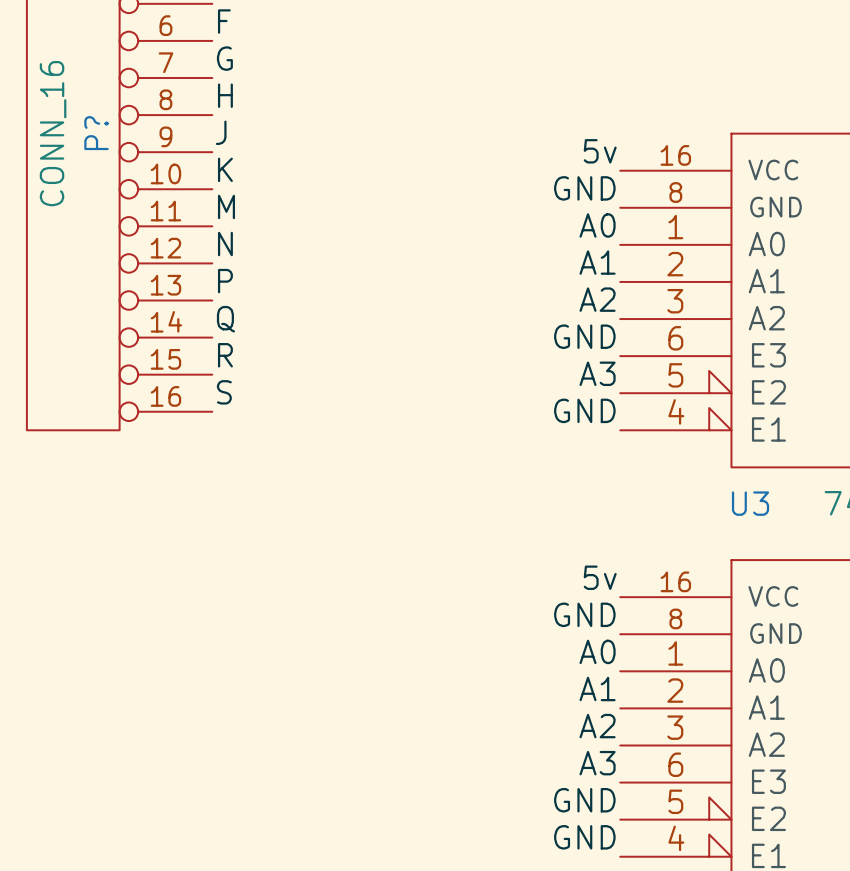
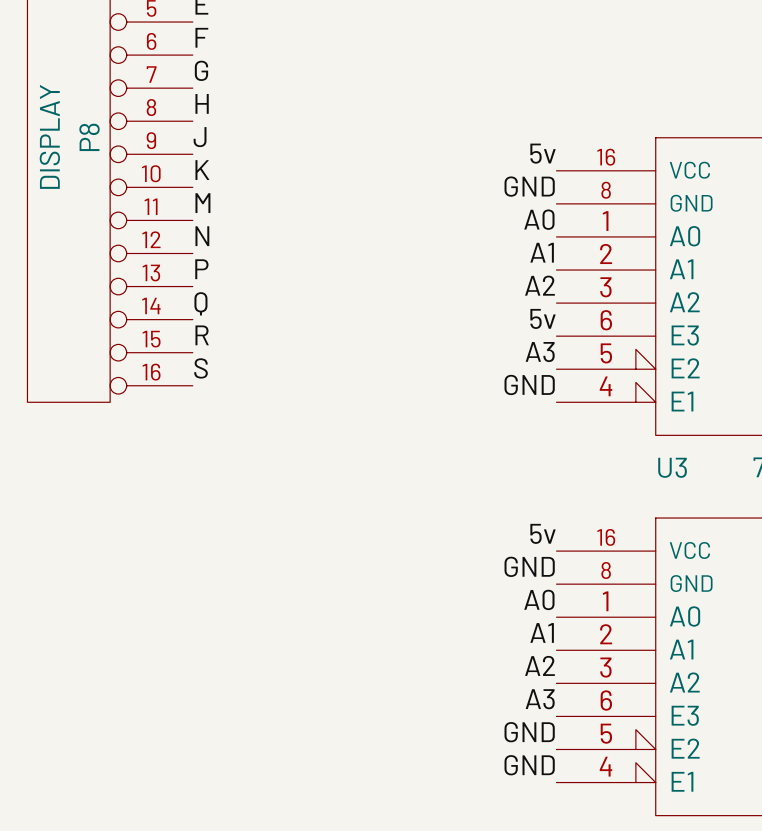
P? value: CONN_16 (53, 133) -> DISPLAY (49, 136)
P? name: P? (96, 133) -> P8 (89, 137)
label: GND (584, 336) -> 5v (543, 318)

